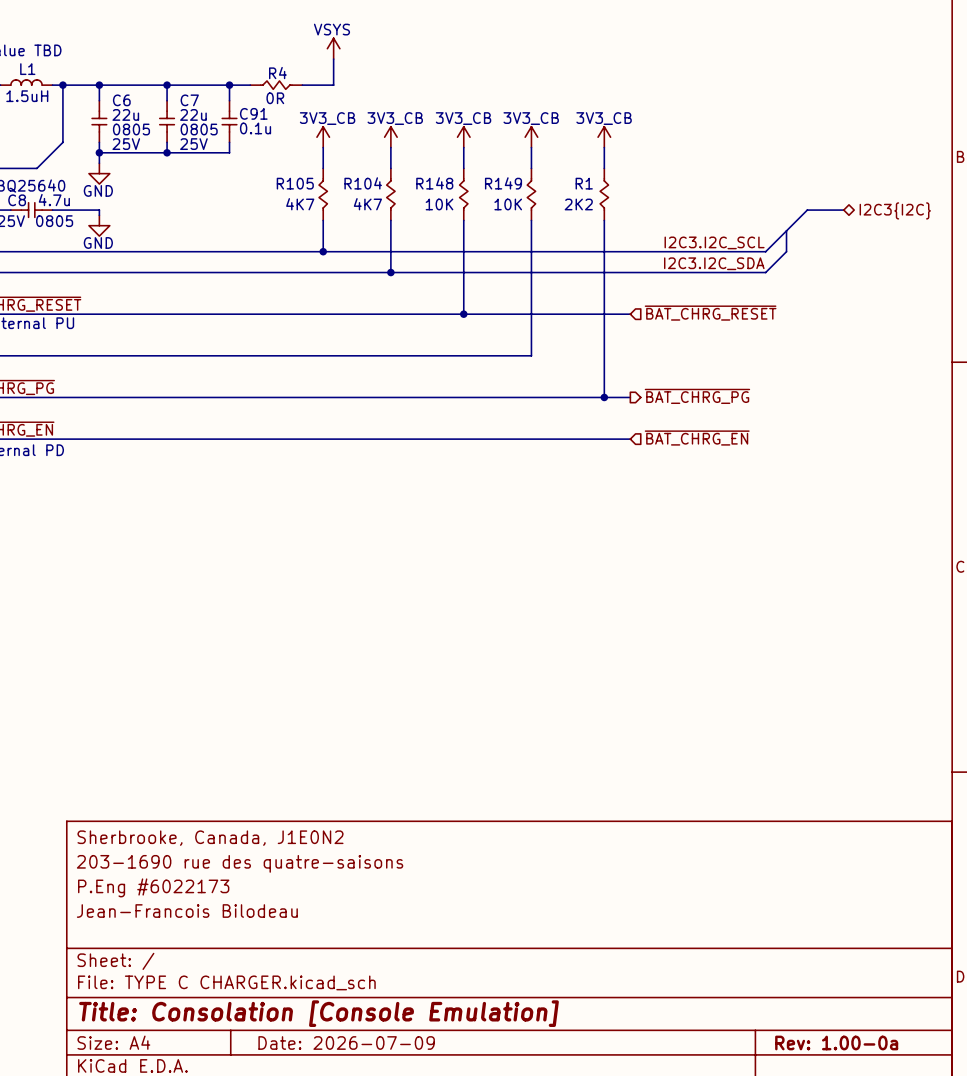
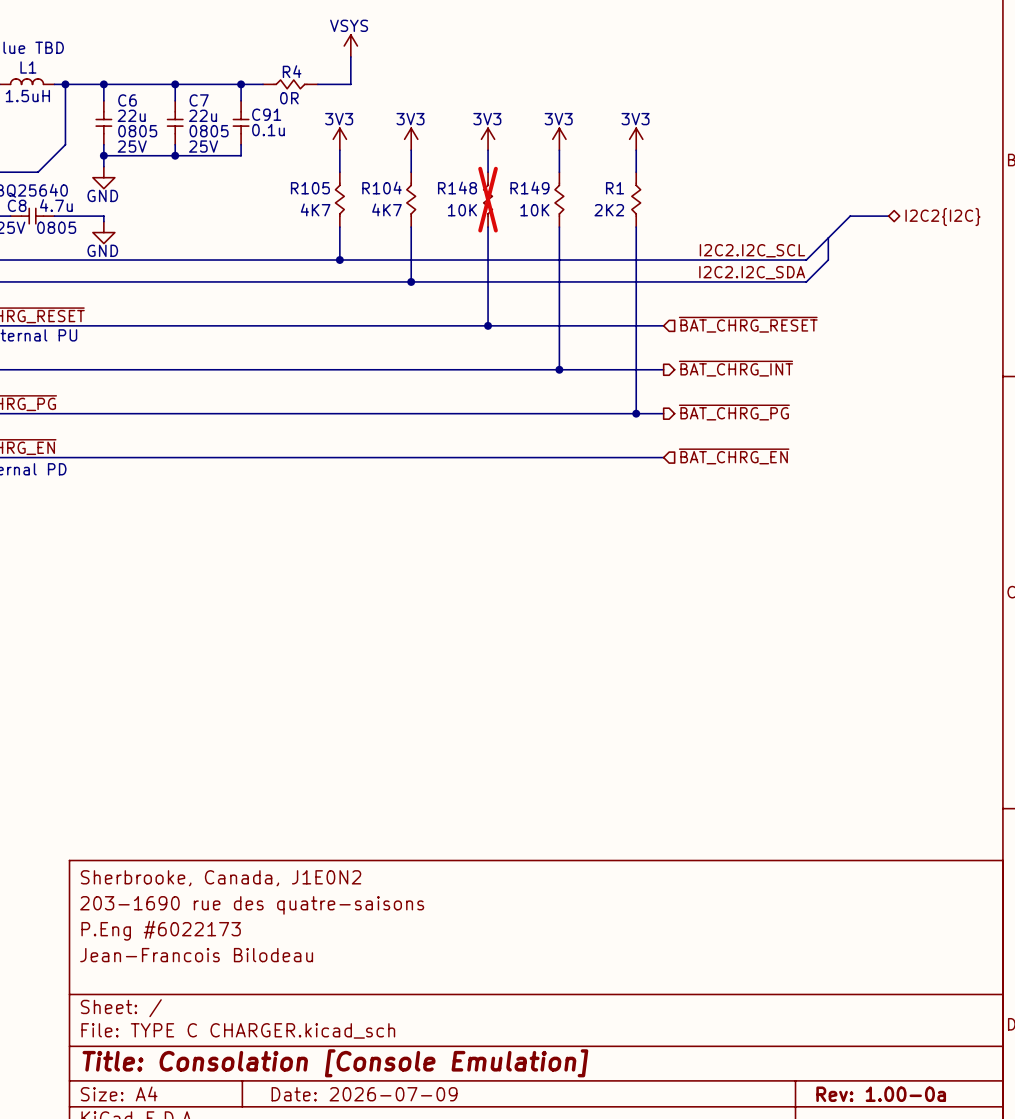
power symbol: 3V3_CB (323, 137) -> 3V3 (339, 139)
power symbol: 3V3_CB (390, 137) -> 3V3 (411, 139)
power symbol: 3V3_CB (463, 137) -> 3V3 (488, 139)
power symbol: 3V3_CB (531, 137) -> 3V3 (559, 139)
power symbol: 3V3_CB (604, 137) -> 3V3 (636, 139)
R148 do-not-place cross: none -> (488, 199)
hierarchical label: I2C3{I2C} (895, 210) -> I2C2{I2C} (942, 217)
label: I2C3.I2C_SCL (714, 242) -> I2C2.I2C_SCL (752, 250)
label: I2C3.I2C_SDA (714, 263) -> I2C2.I2C_SDA (752, 272)
hierarchical label: none -> ~{BAT_CHRG_INT} (735, 368)
wire: none -> (559, 369) (663, 369)
junction: none -> (559, 369)

